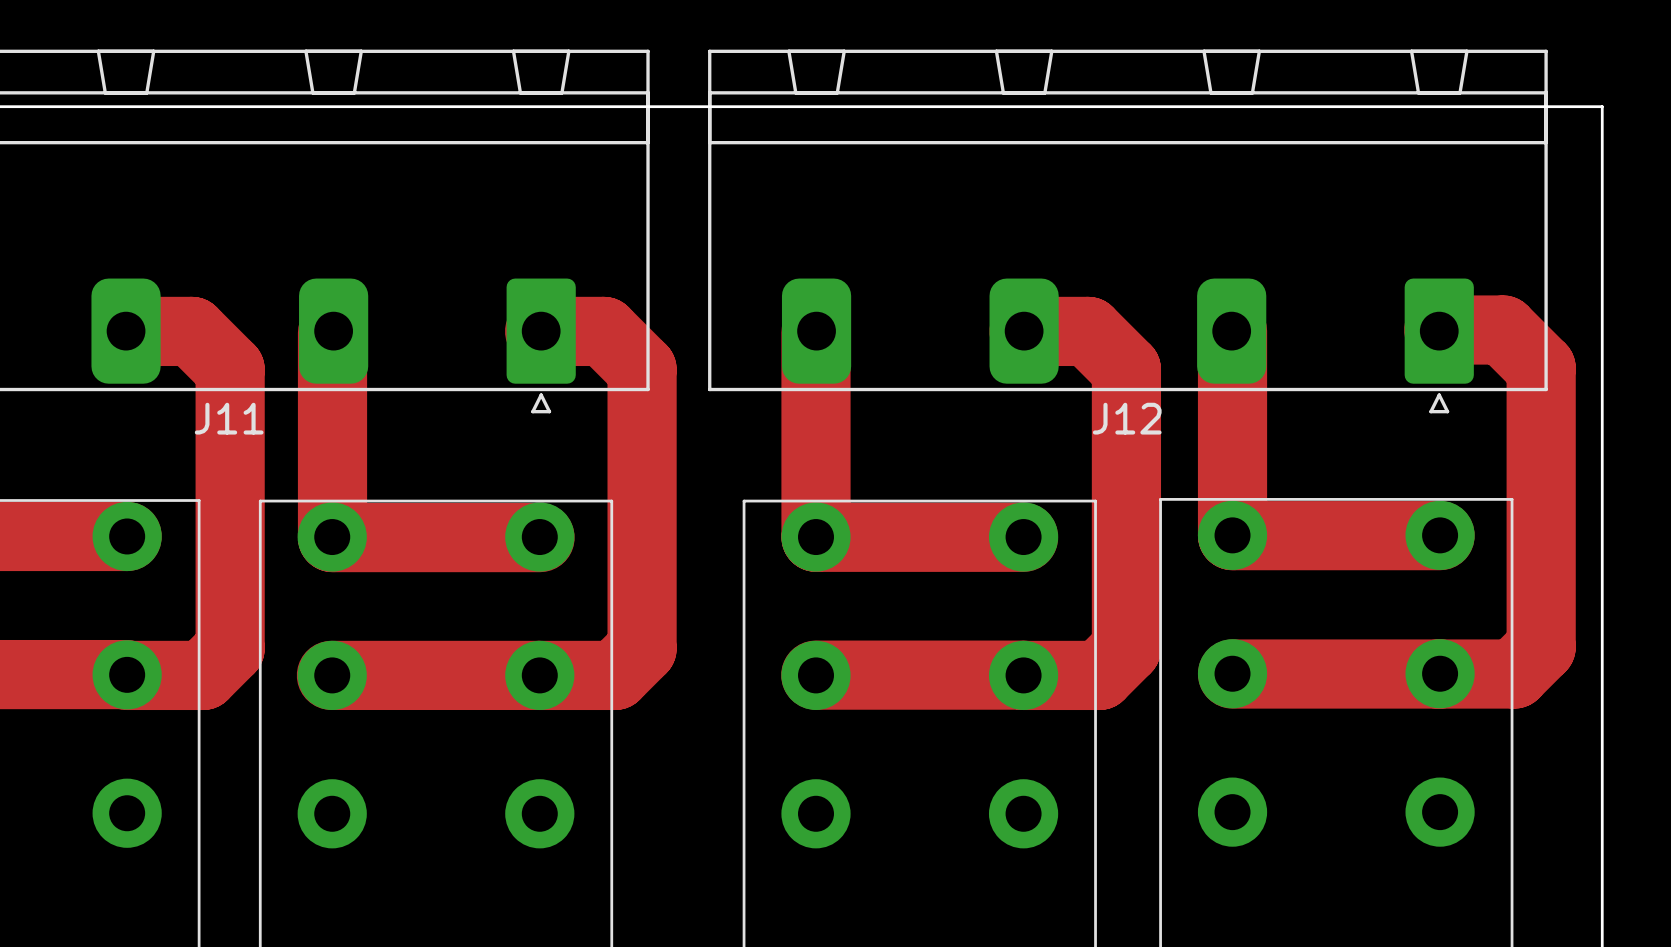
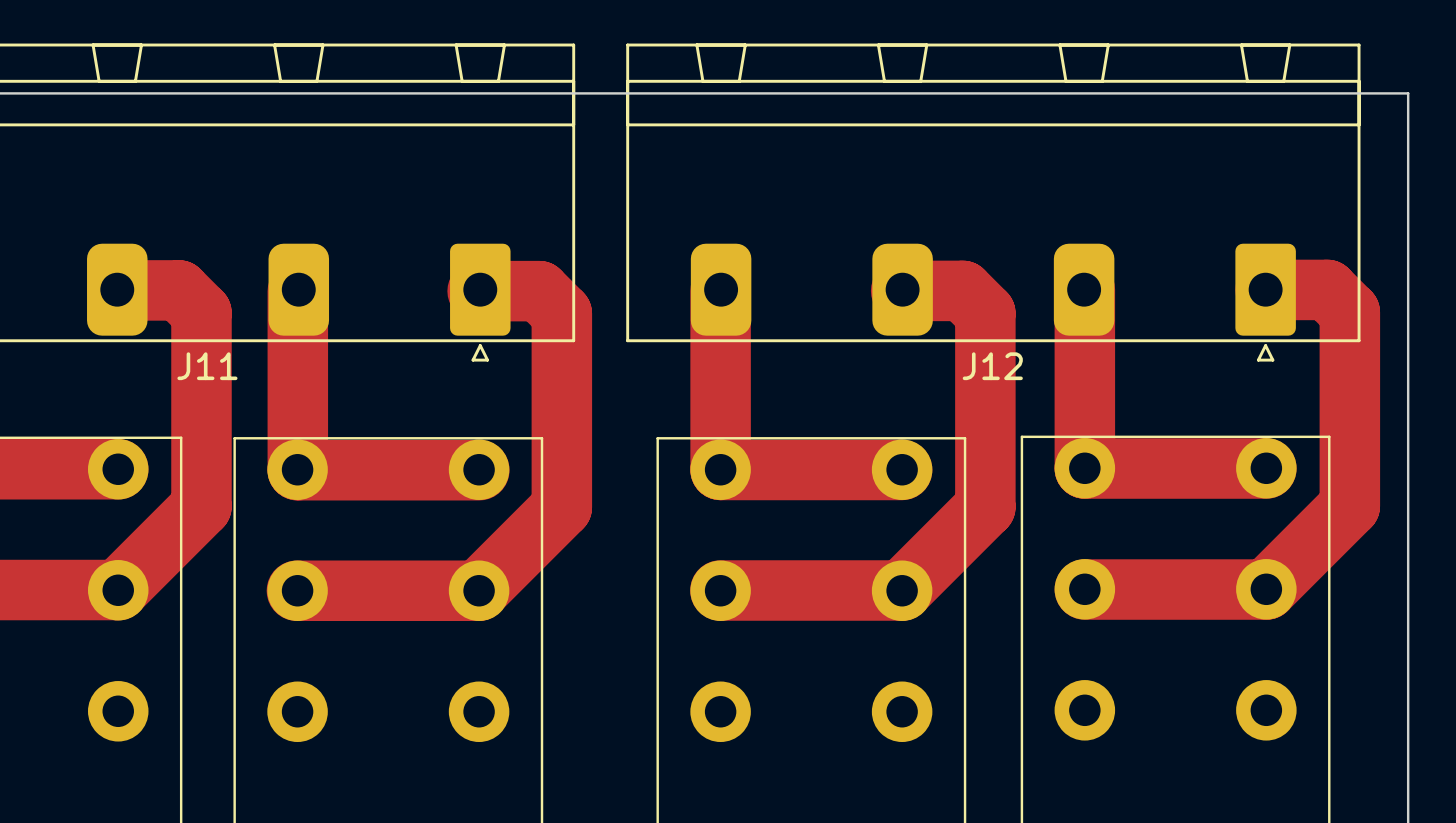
track: (1438, 330) (1503, 330) (1541, 368) (1541, 647) (1514, 674) (1440, 674) -> (1265, 289) (1327, 289) (1349, 312) (1349, 506) (1266, 589)
track: (127, 331) (192, 331) (230, 369) (230, 648) (203, 675) (126, 675) -> (117, 290) (178, 290) (201, 312) (201, 506) (118, 590)
track: (539, 331) (604, 331) (642, 369) (642, 648) (615, 675) (538, 675) -> (477, 291) (539, 291) (561, 313) (561, 507) (478, 590)
track: (1023, 331) (1088, 331) (1126, 369) (1126, 648) (1099, 675) (1023, 675) -> (901, 290) (962, 290) (985, 313) (985, 507) (901, 590)

